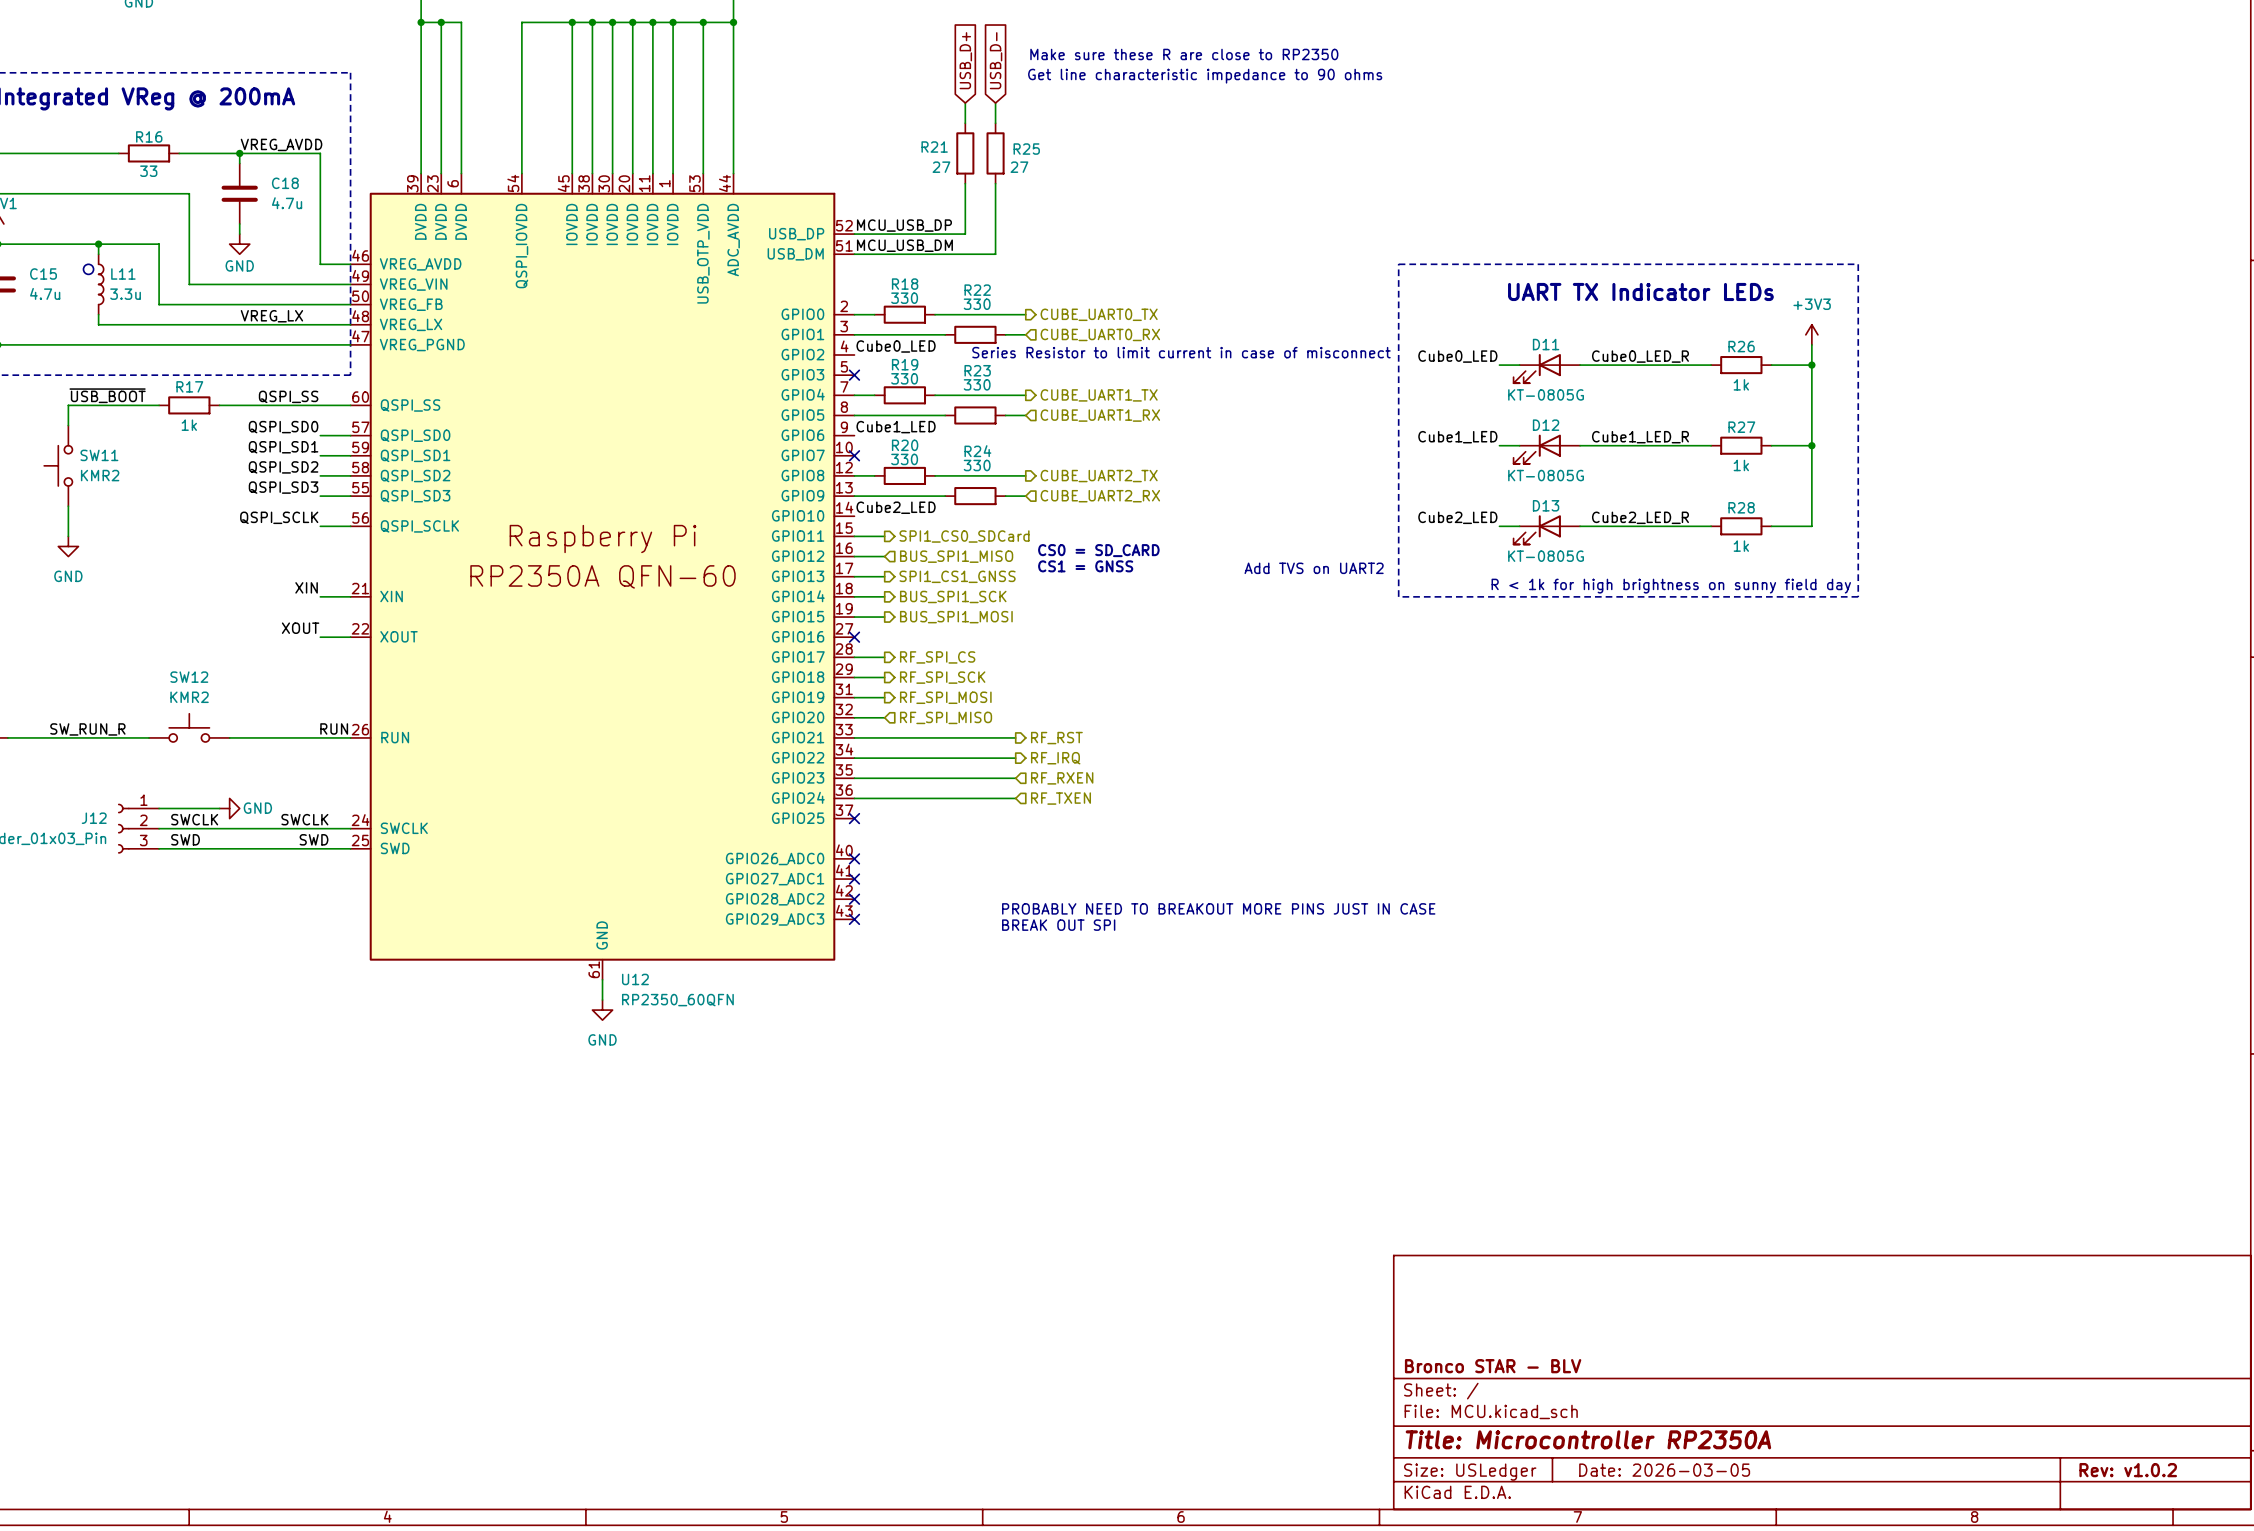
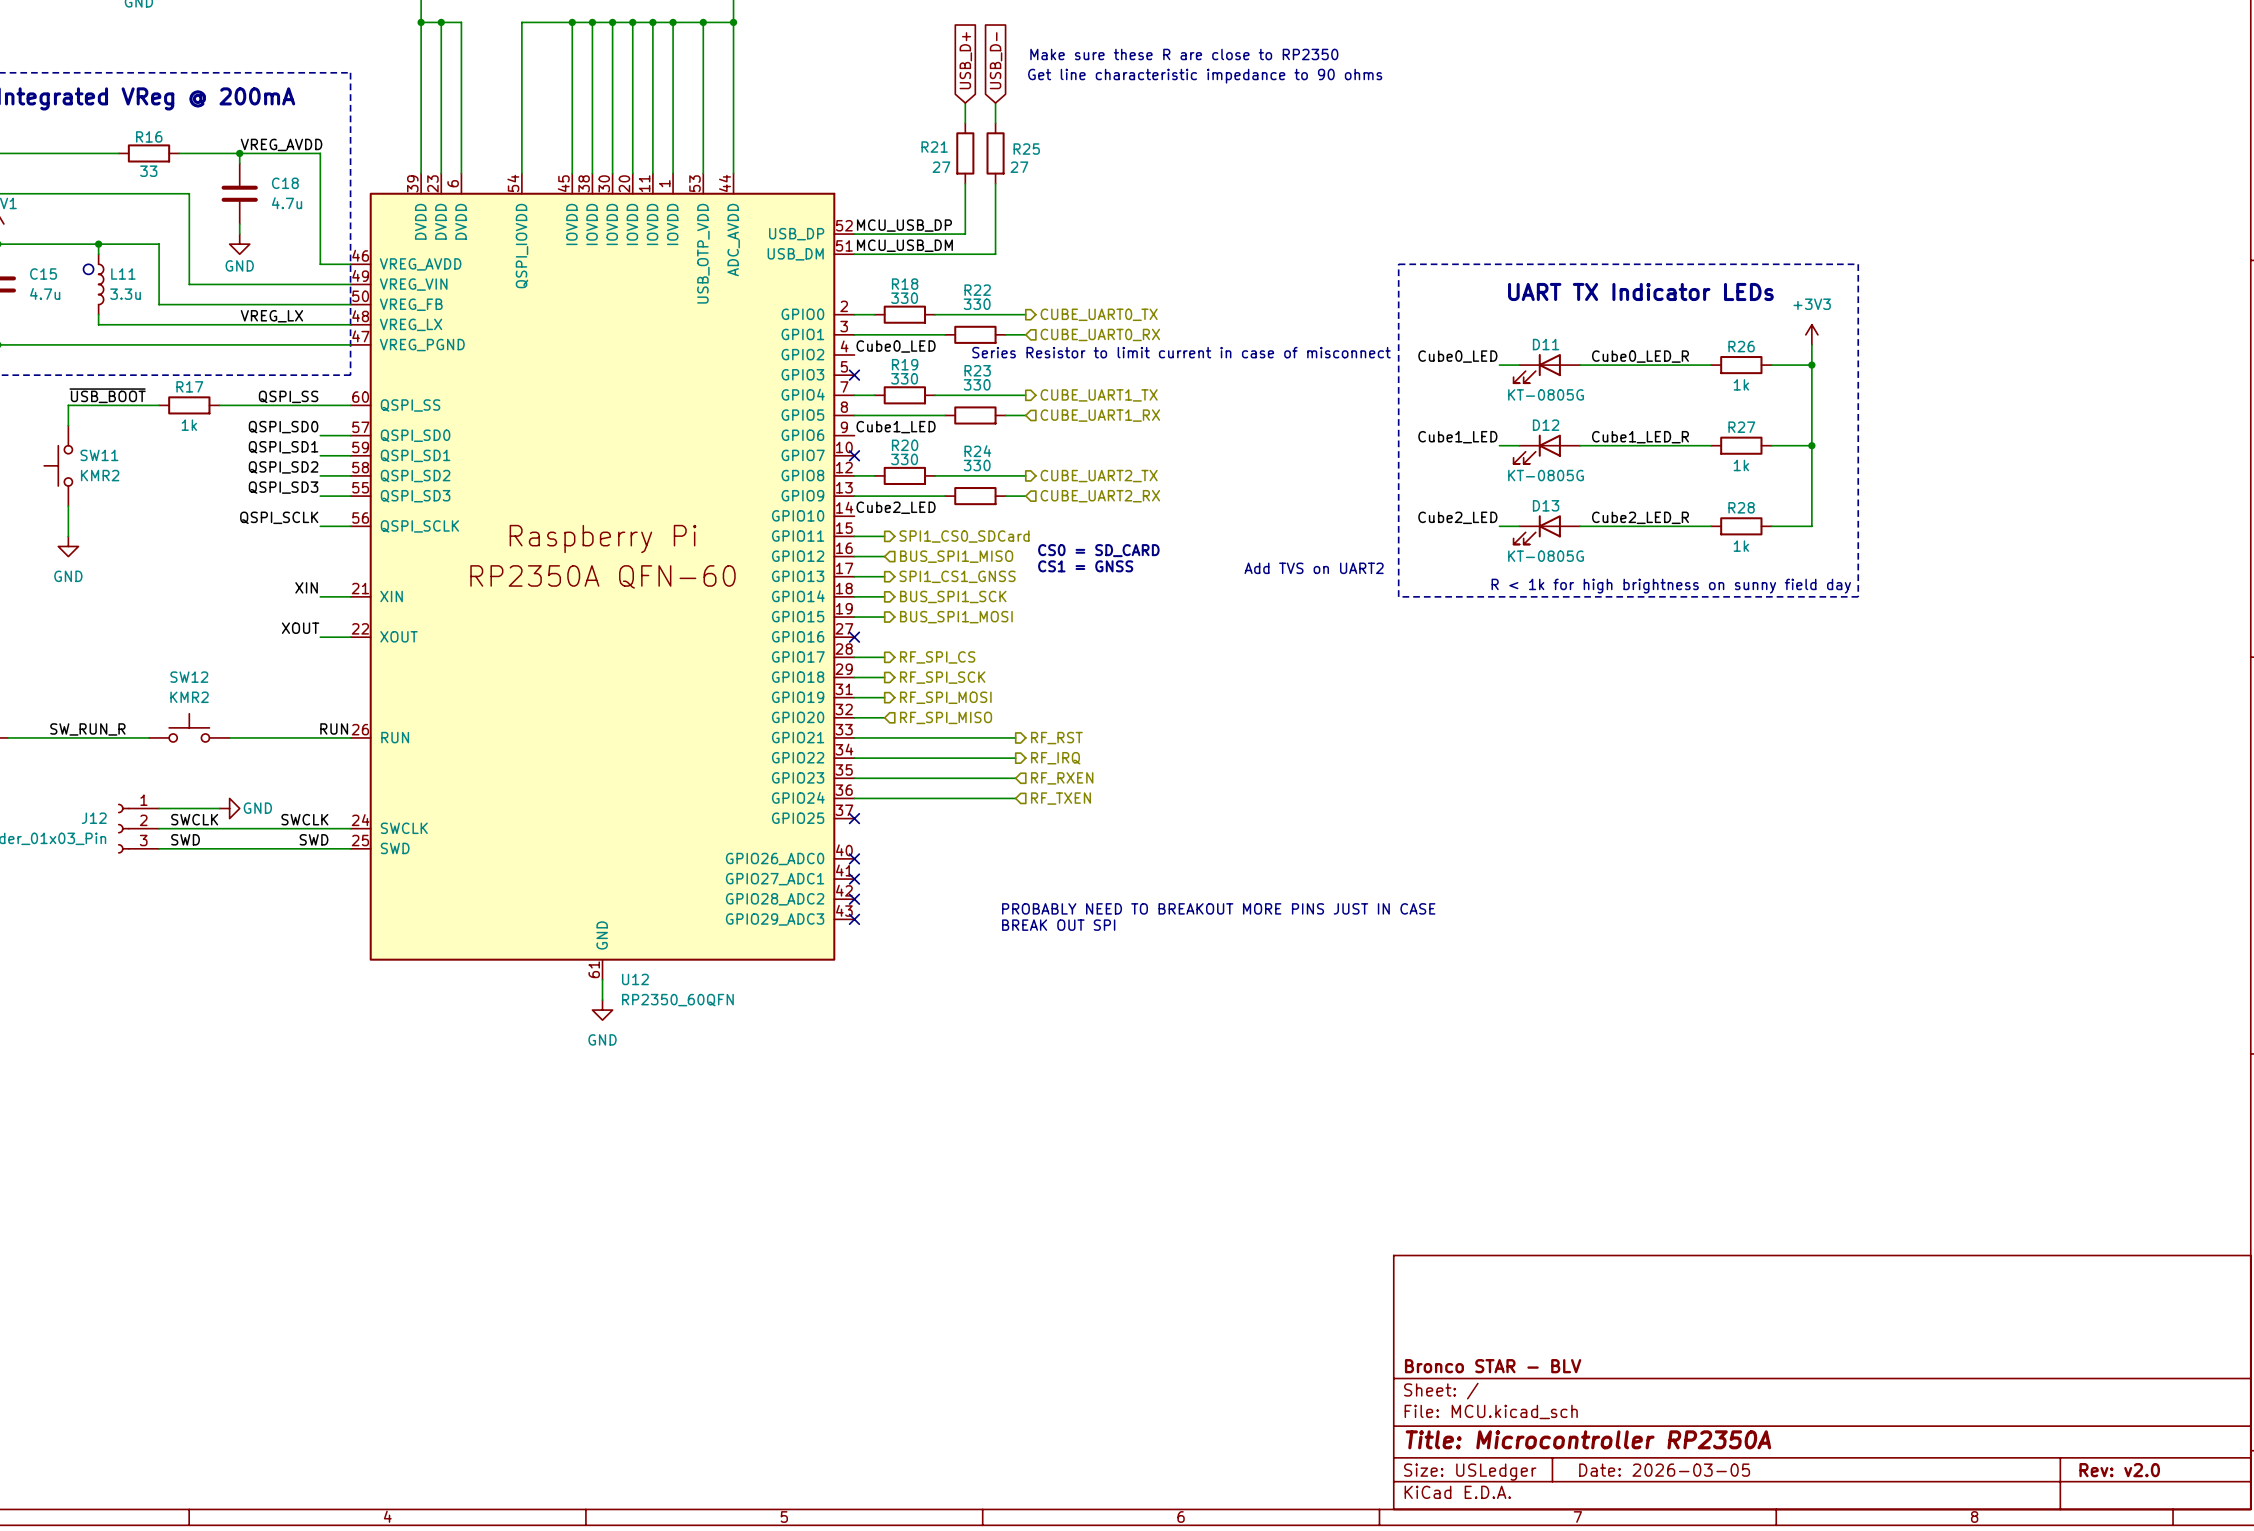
title block: Rev: v1.0.2 (2128, 1470) -> Rev: v2.0 (2119, 1470)

